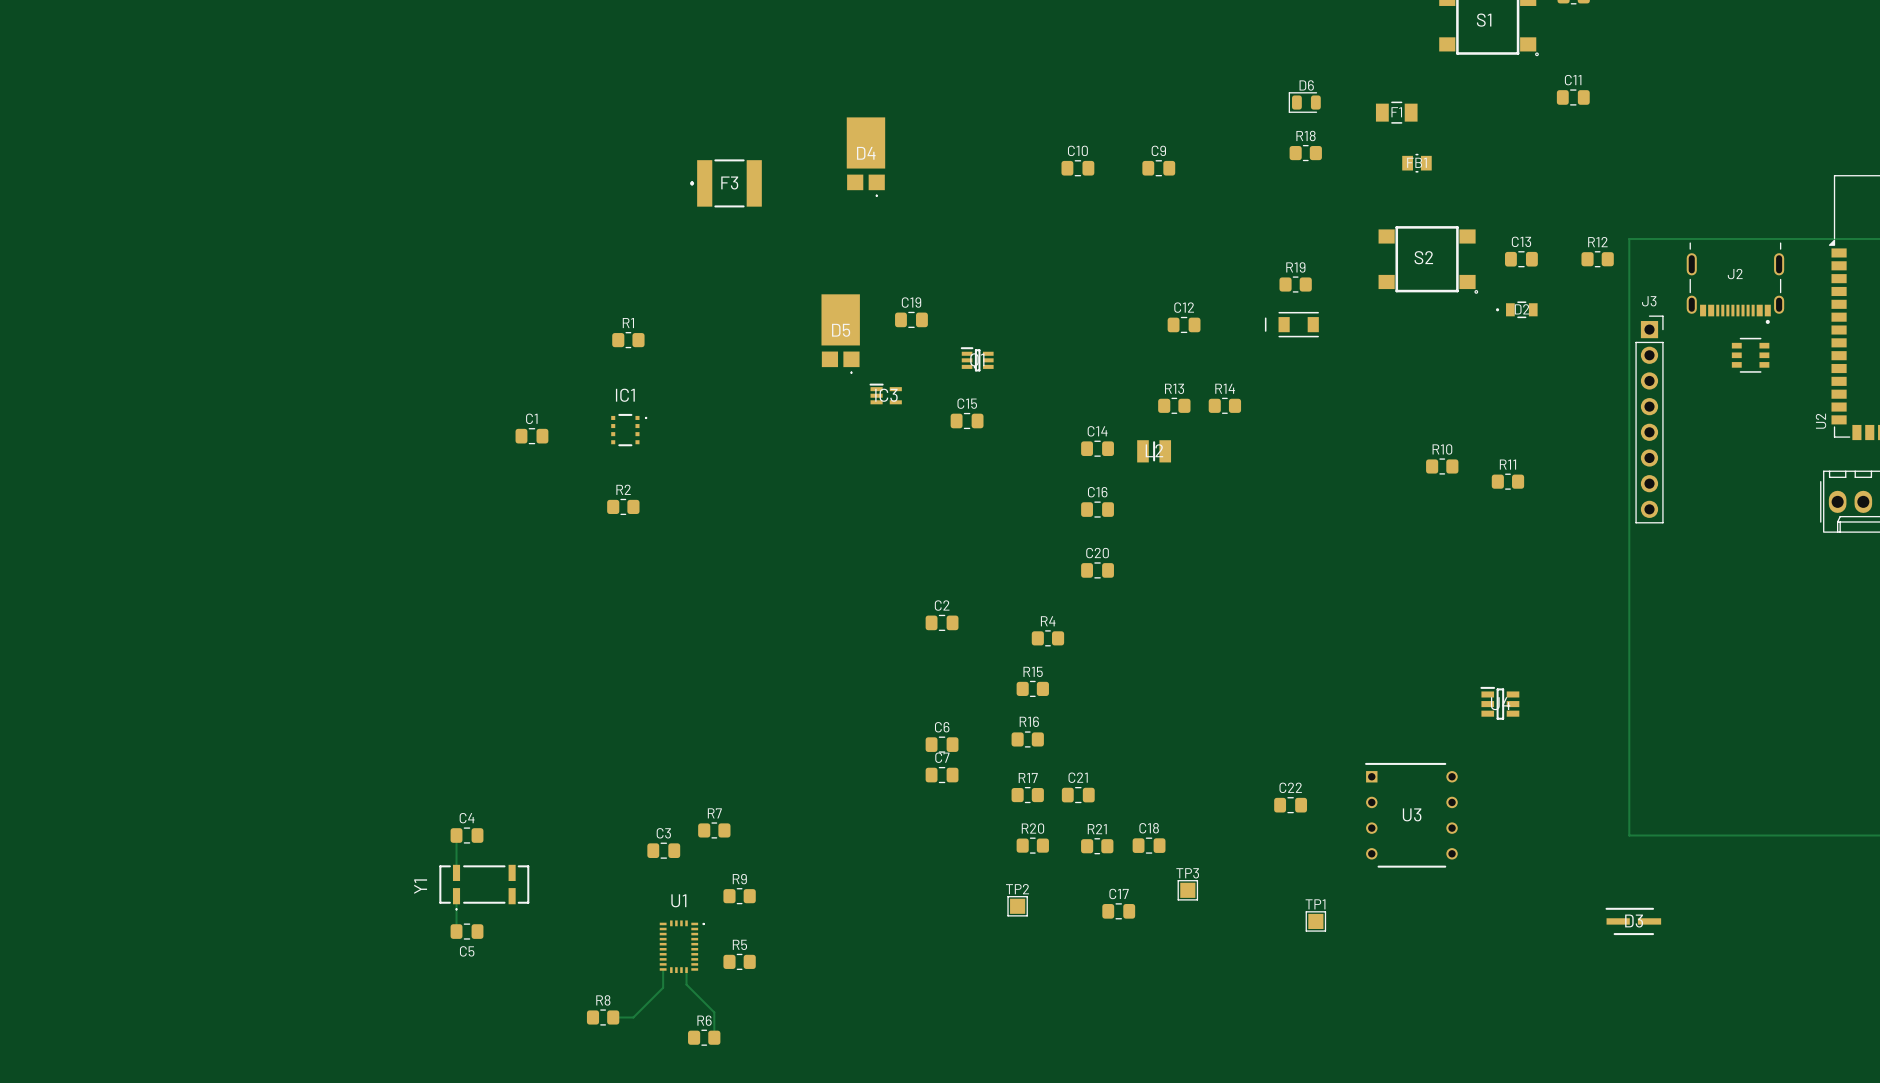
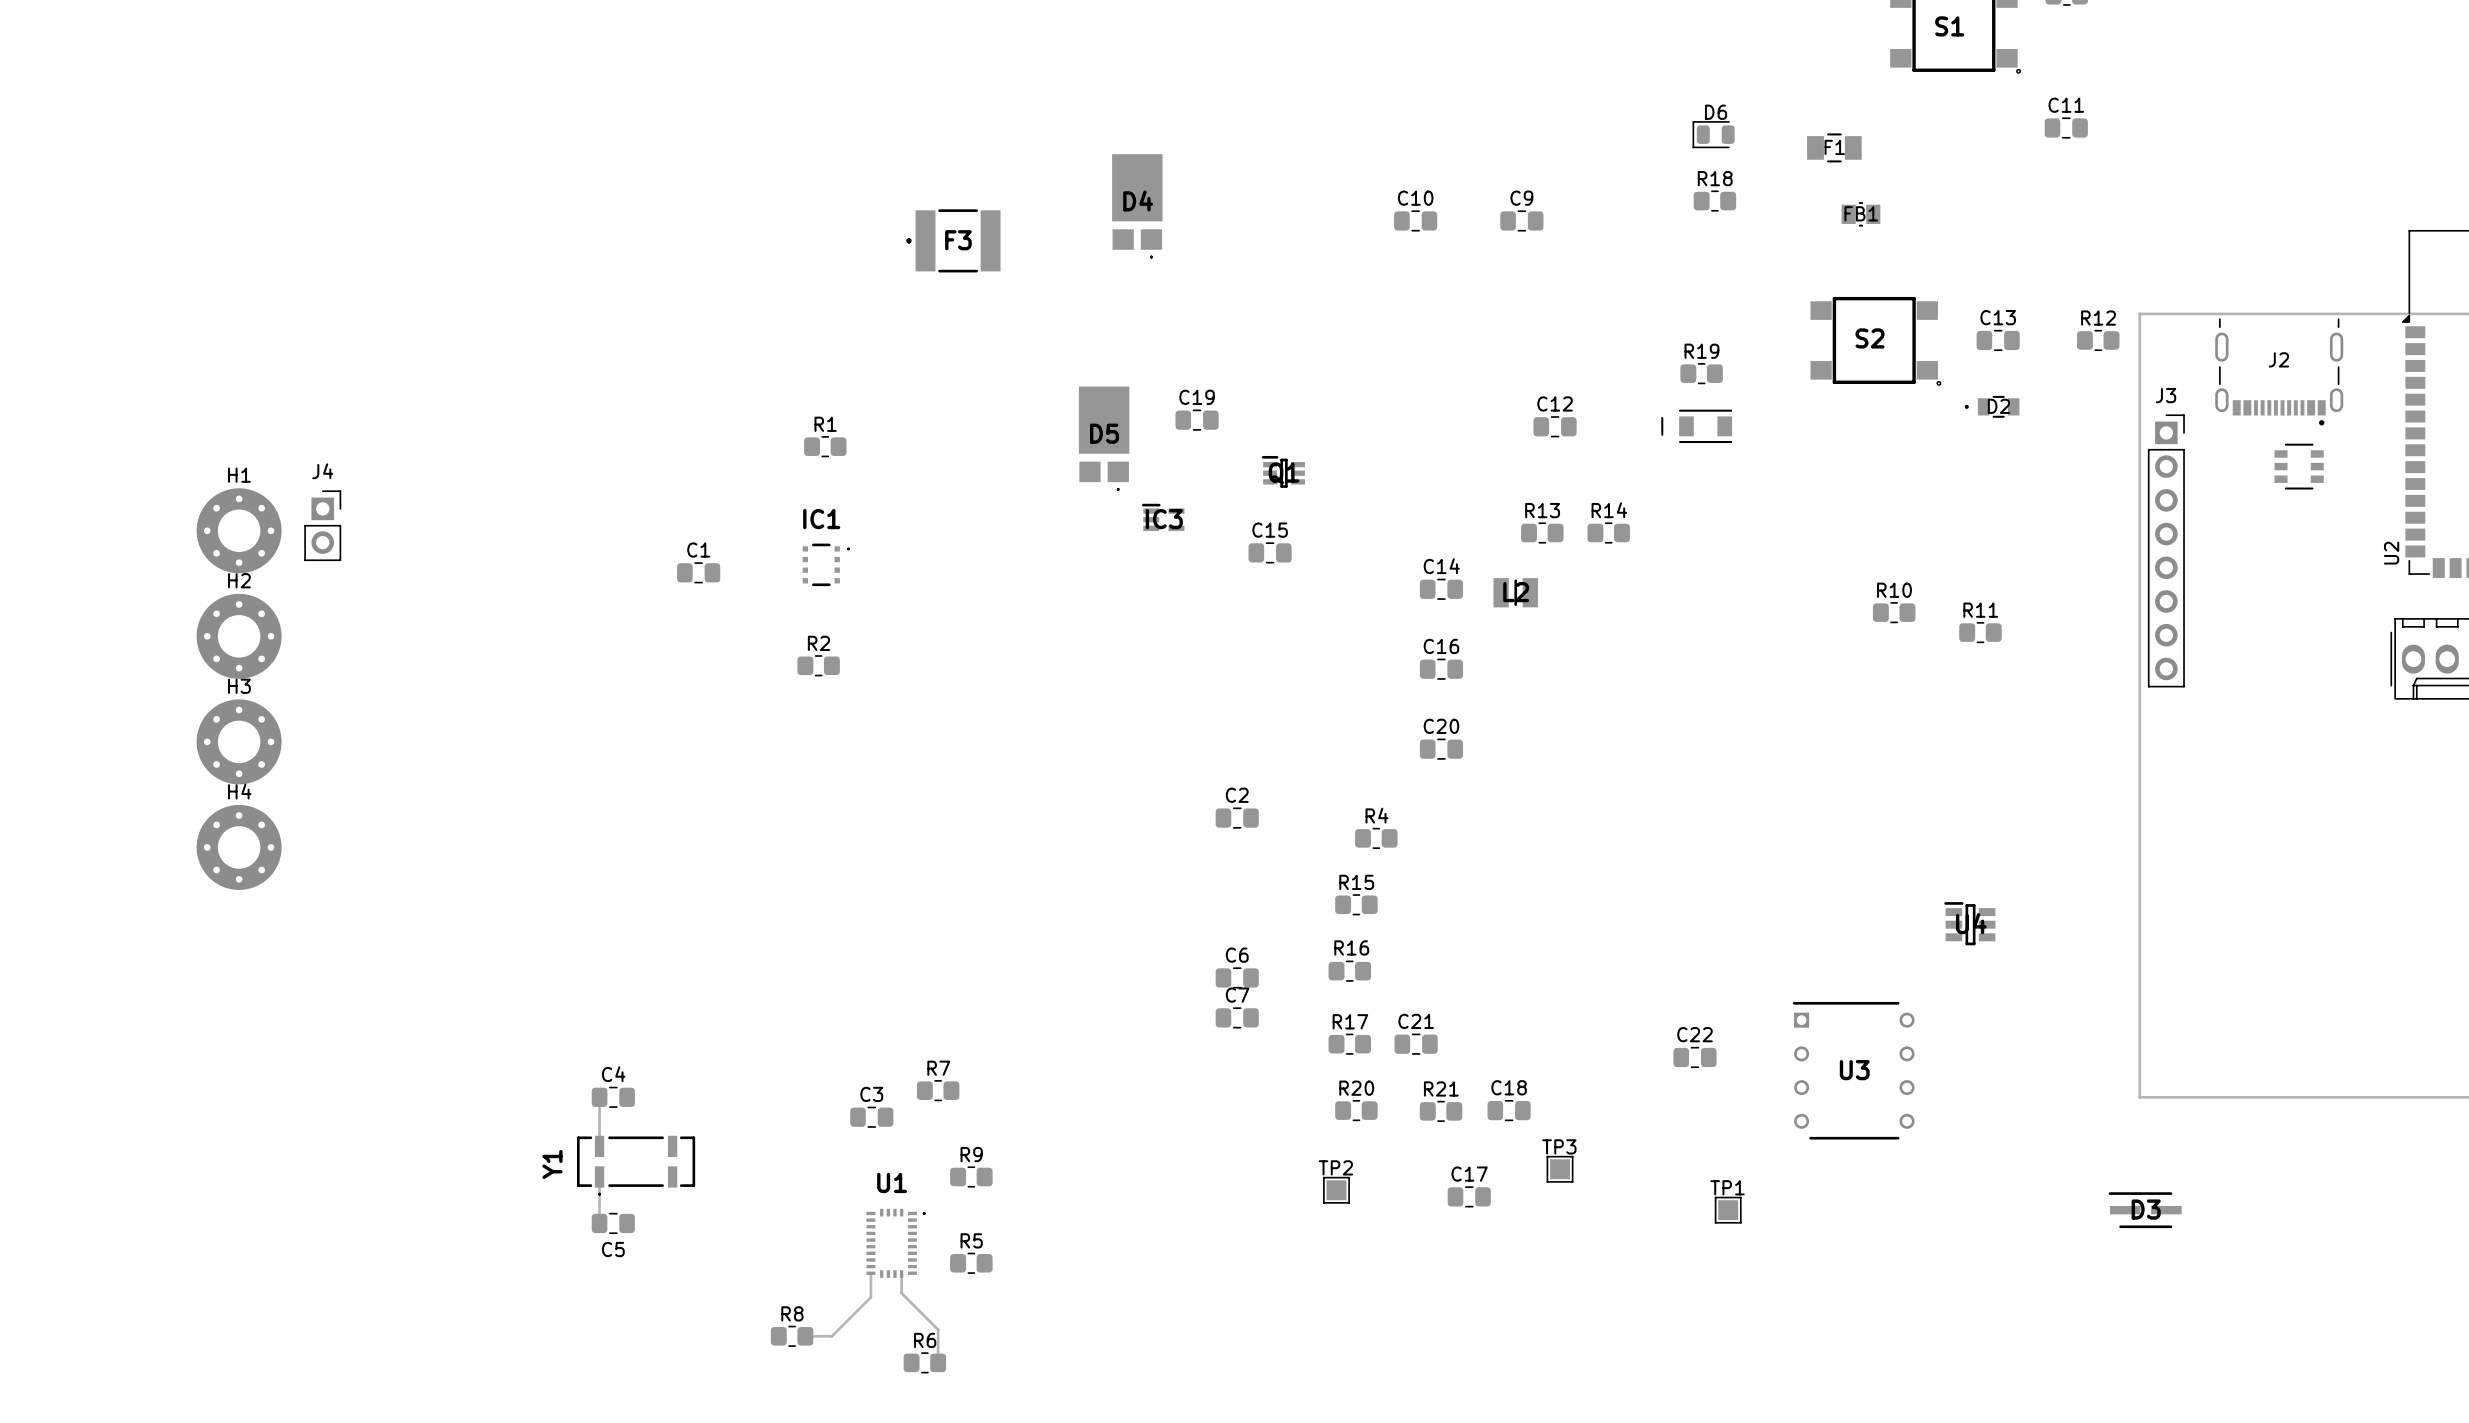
J4: none -> (322, 525)
H1: none -> (239, 530)
H2: none -> (239, 636)
H3: none -> (239, 741)
H4: none -> (239, 847)

